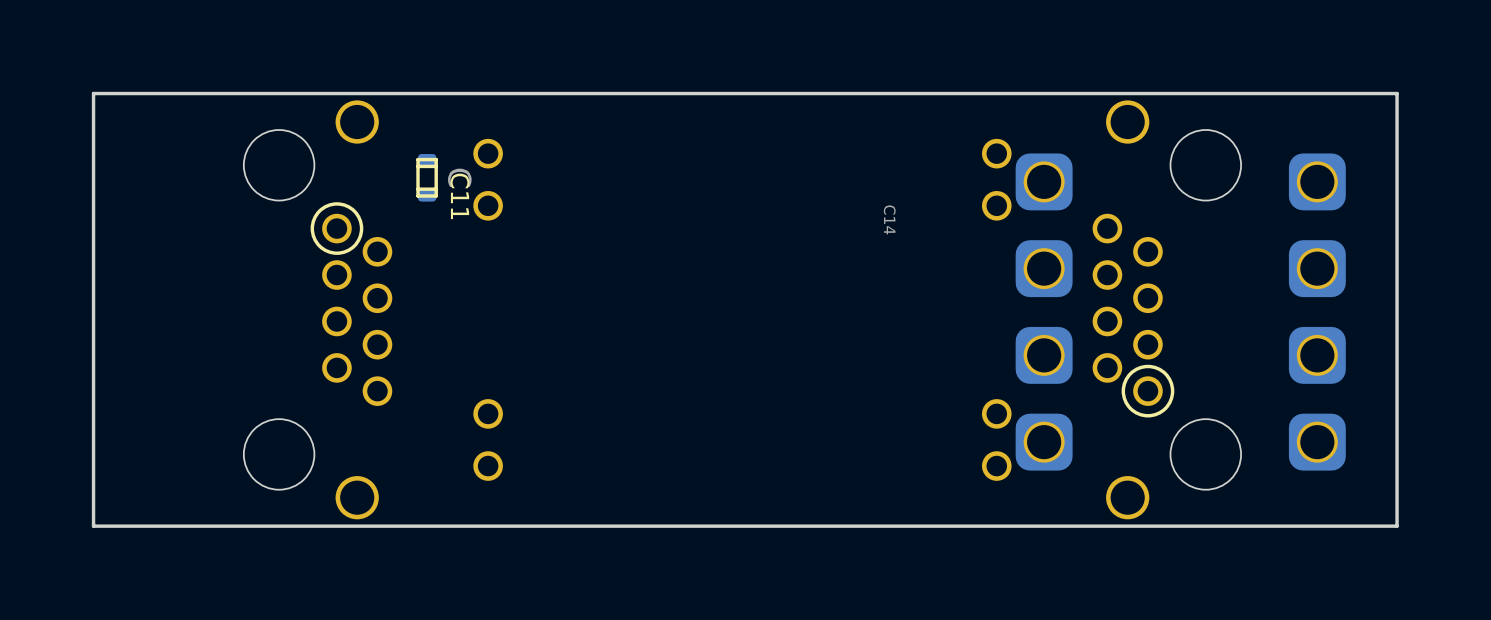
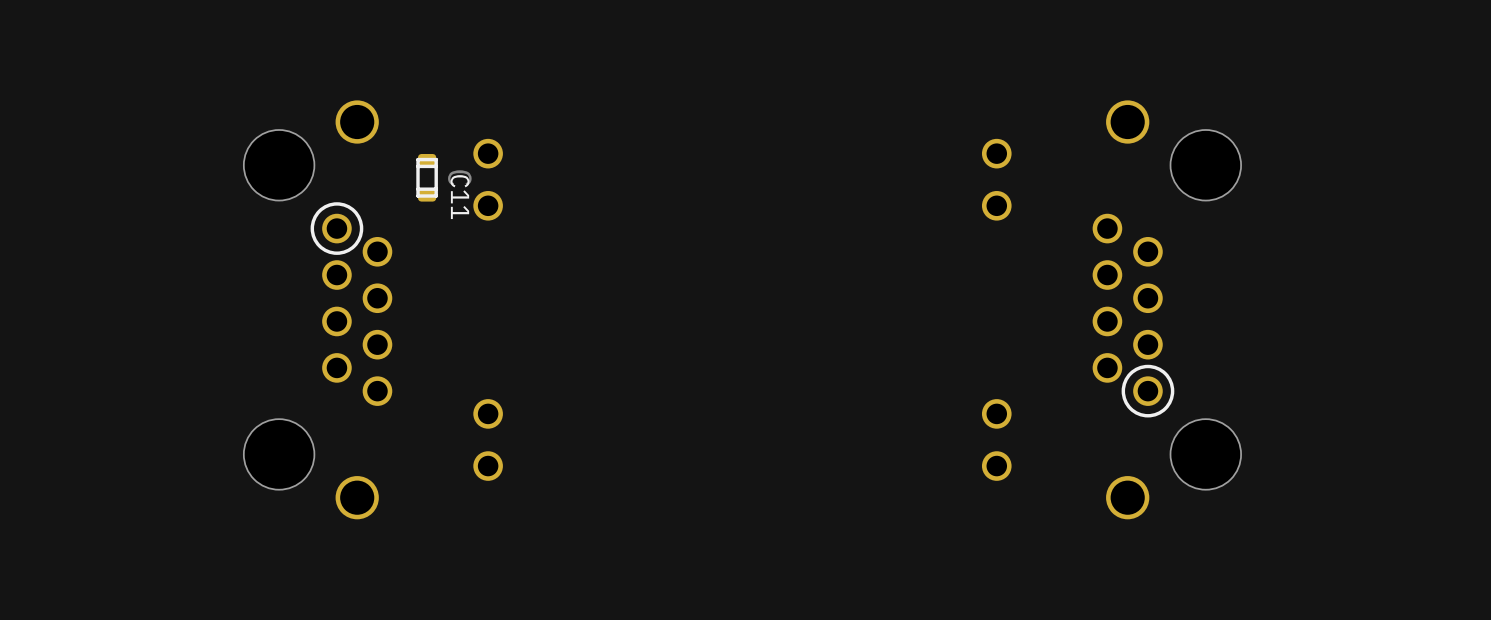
board edge: (1397, 93) (1397, 526) (93, 526) (93, 93) (1397, 93) -> none
C14: (889, 219) -> none
part: (1044, 312) -> none
part: (1317, 312) -> none

